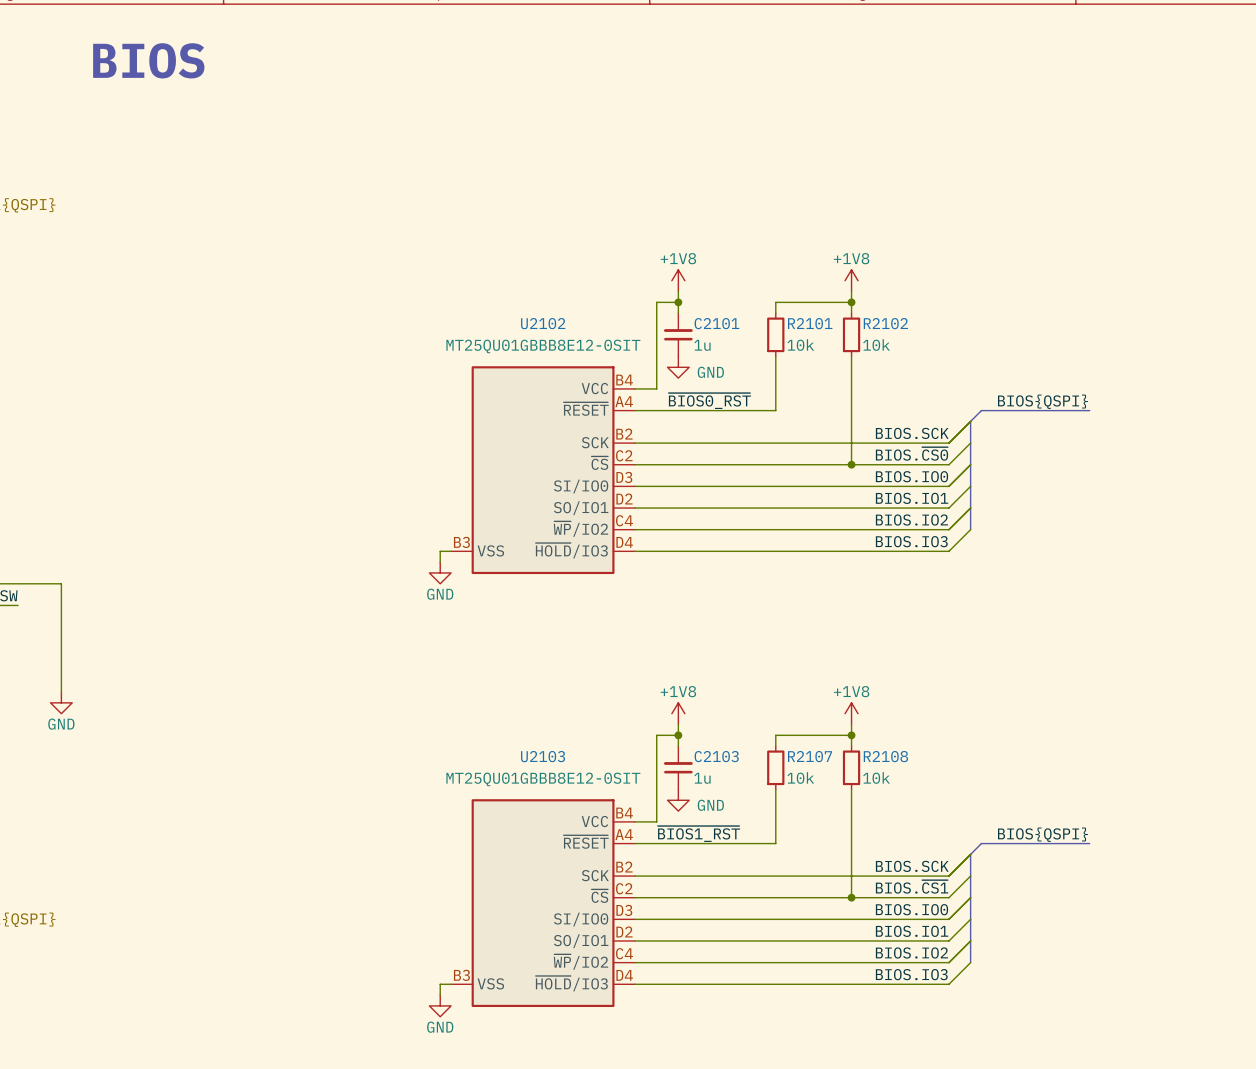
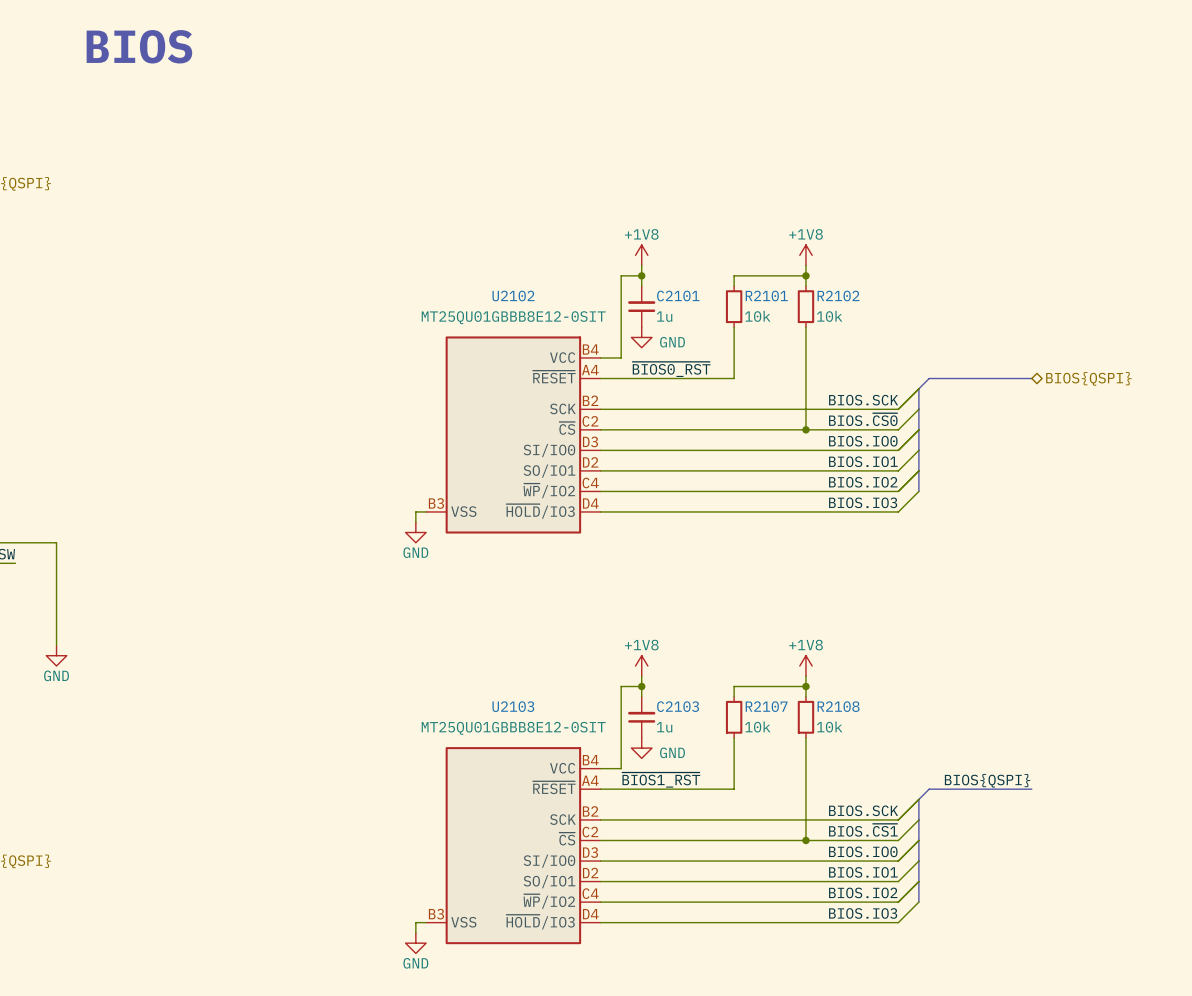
label: BIOS{QSPI} (1043, 401) -> none
hierarchical label: none -> BIOS{QSPI} (1088, 378)

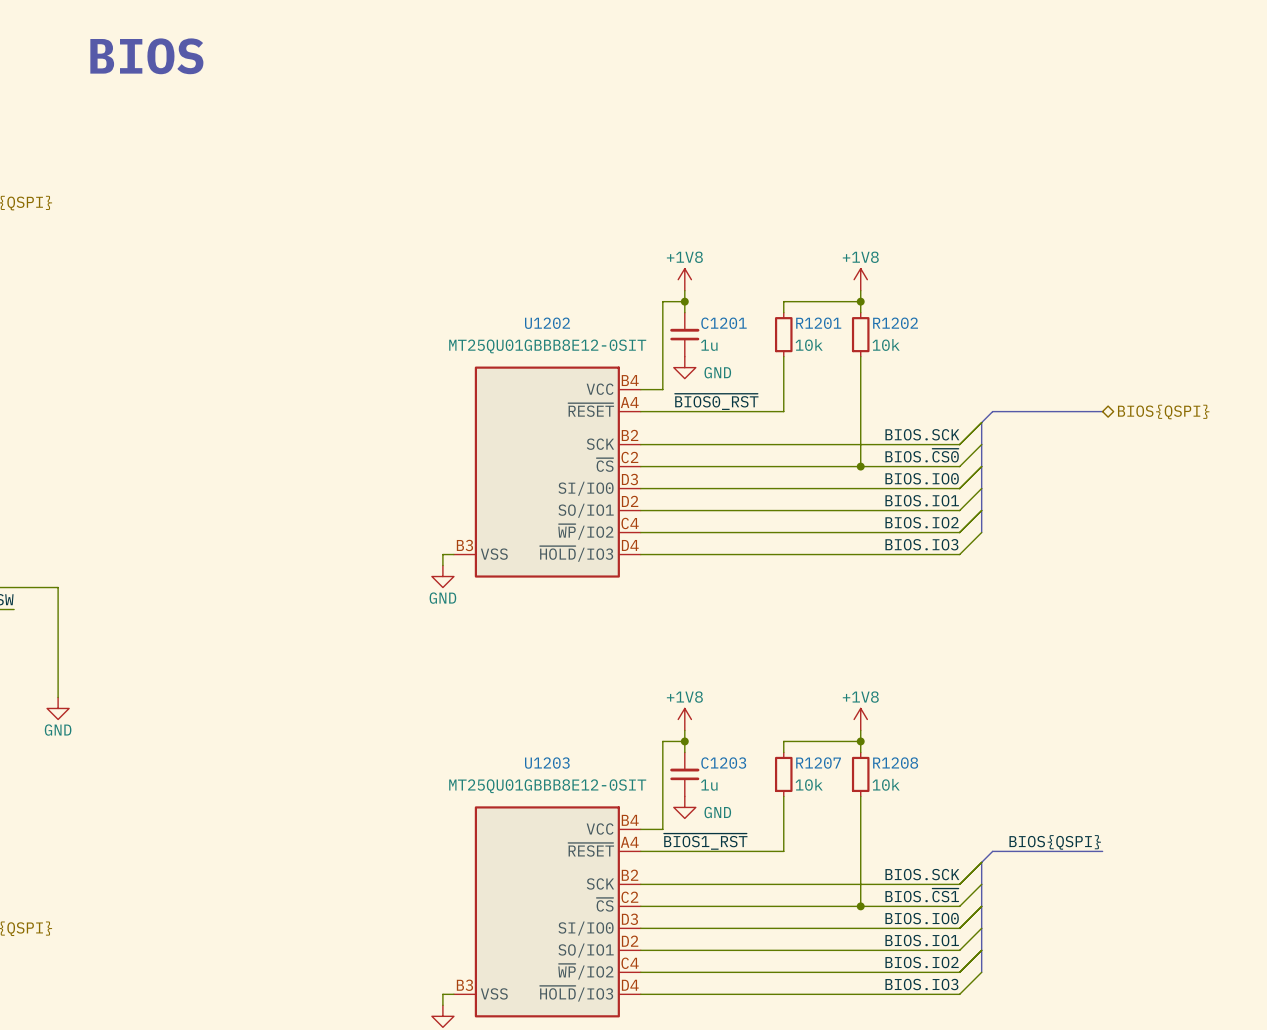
U2102 name: U2102 (513, 296) -> U1202 (547, 323)
C2101 name: C2101 (678, 296) -> C1201 (724, 323)
R2101 name: R2101 (766, 296) -> R1201 (818, 323)
R2102 name: R2102 (838, 296) -> R1202 (895, 323)
U2103 name: U2103 (513, 706) -> U1203 (547, 763)
C2103 name: C2103 (678, 706) -> C1203 (723, 763)
R2107 name: R2107 (766, 706) -> R1207 (818, 763)
R2108 name: R2108 (838, 706) -> R1208 (895, 763)

